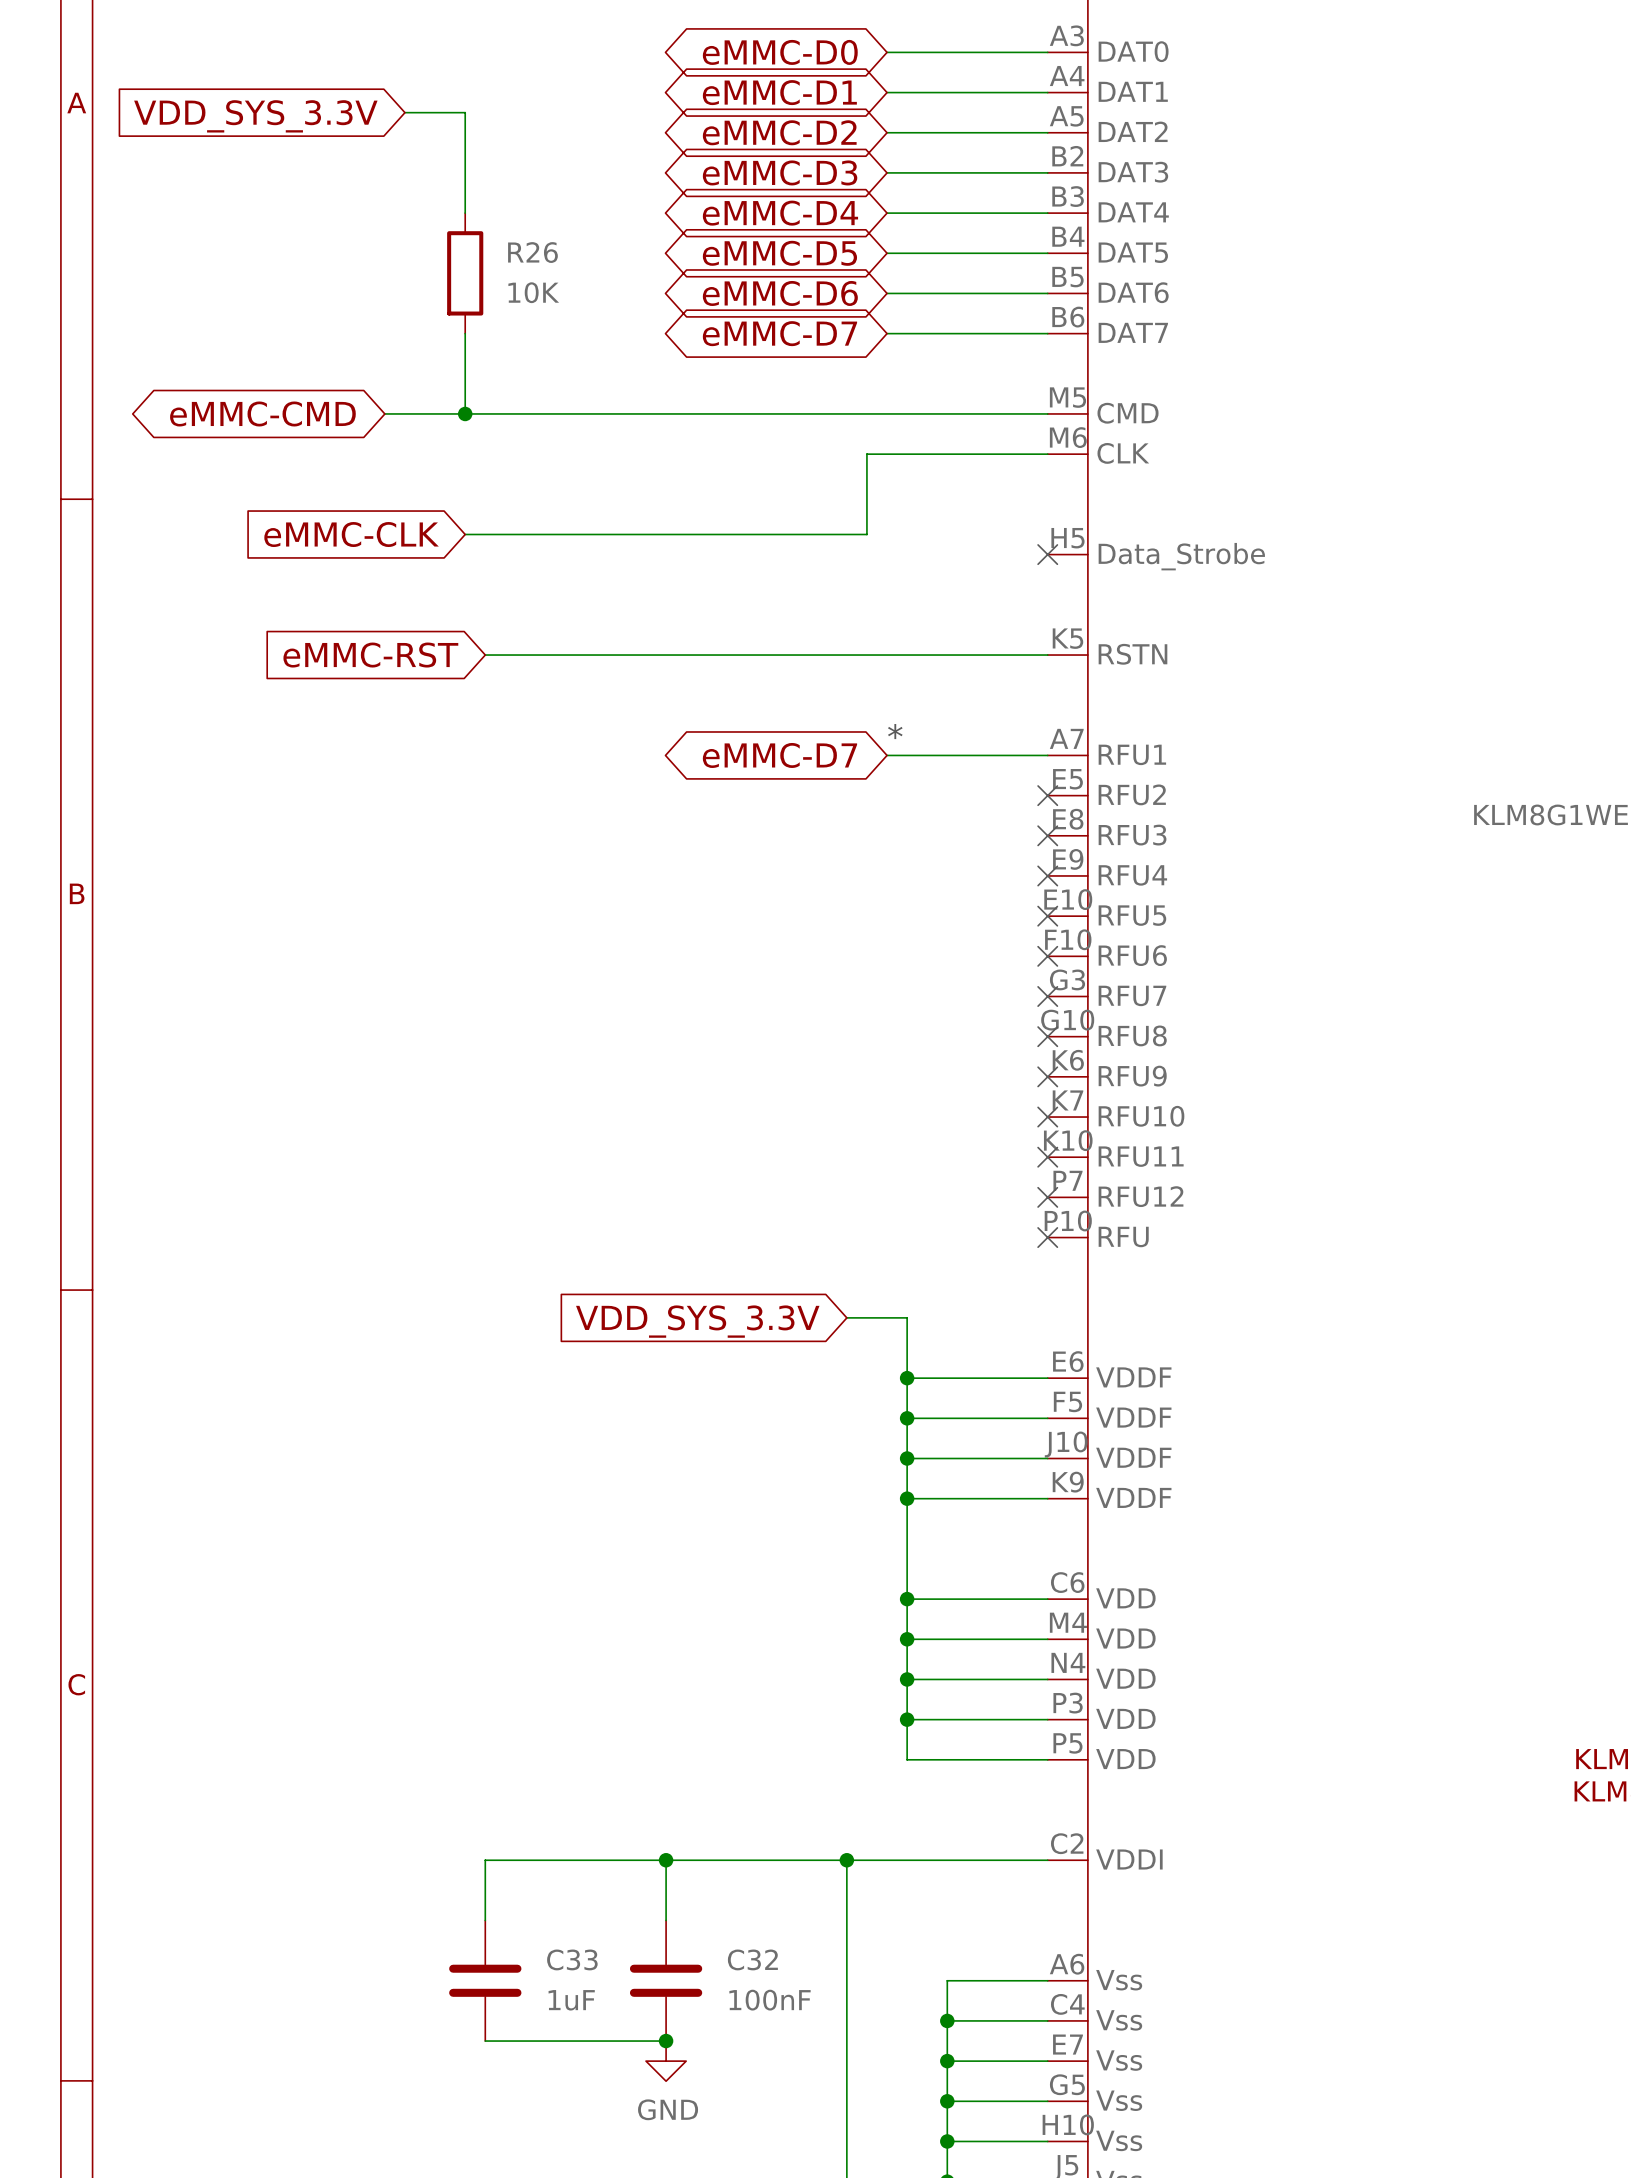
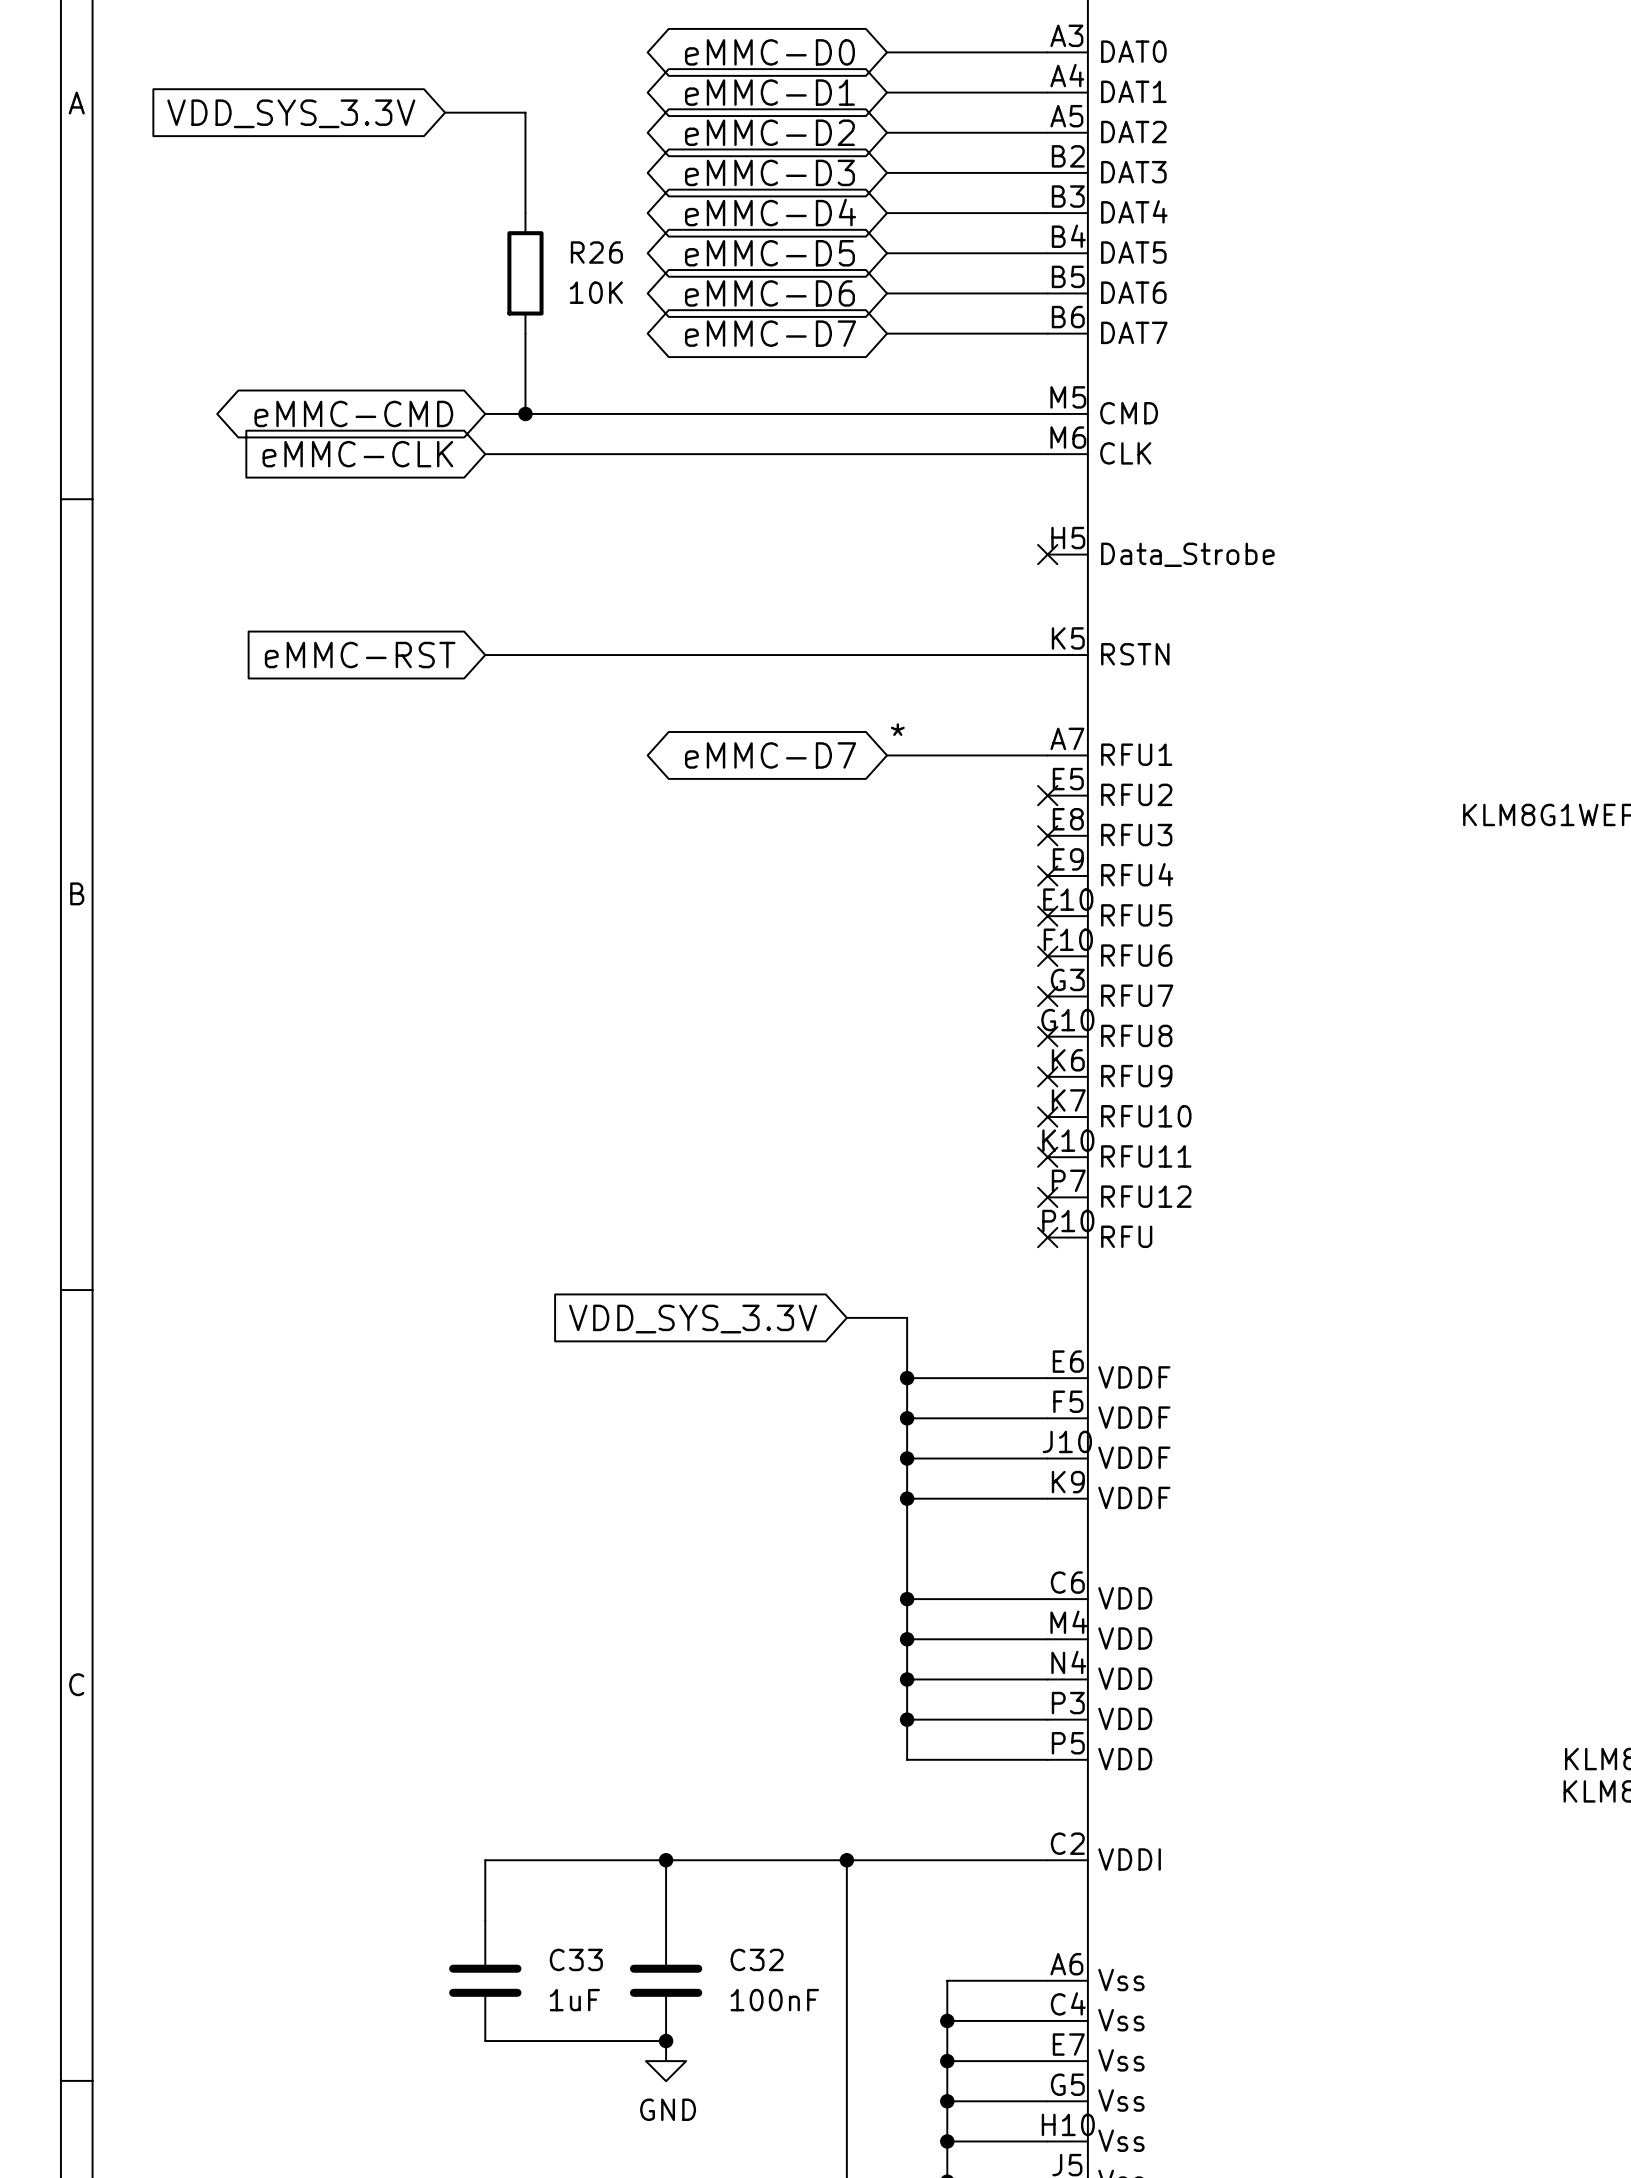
wire: (404, 112) (445, 112) -> none
wire: (465, 112) (465, 213) -> (465, 112) (525, 112) (525, 213)
global label position: VDD_SYS_3.3V (255, 116) -> VDD_SYS_3.3V (291, 113)
R26 position: (465, 273) -> (525, 273)
wire: (465, 333) (465, 413) -> (525, 333) (525, 413)
global label position: eMMC-CMD (262, 413) -> eMMC-CMD (353, 413)
wire: (384, 413) (485, 413) -> none
junction position: (465, 413) -> (525, 413)
wire: (866, 454) (866, 534) (465, 534) -> (866, 454) (485, 454)
global label position: eMMC-CLK (351, 534) -> eMMC-CLK (357, 454)

